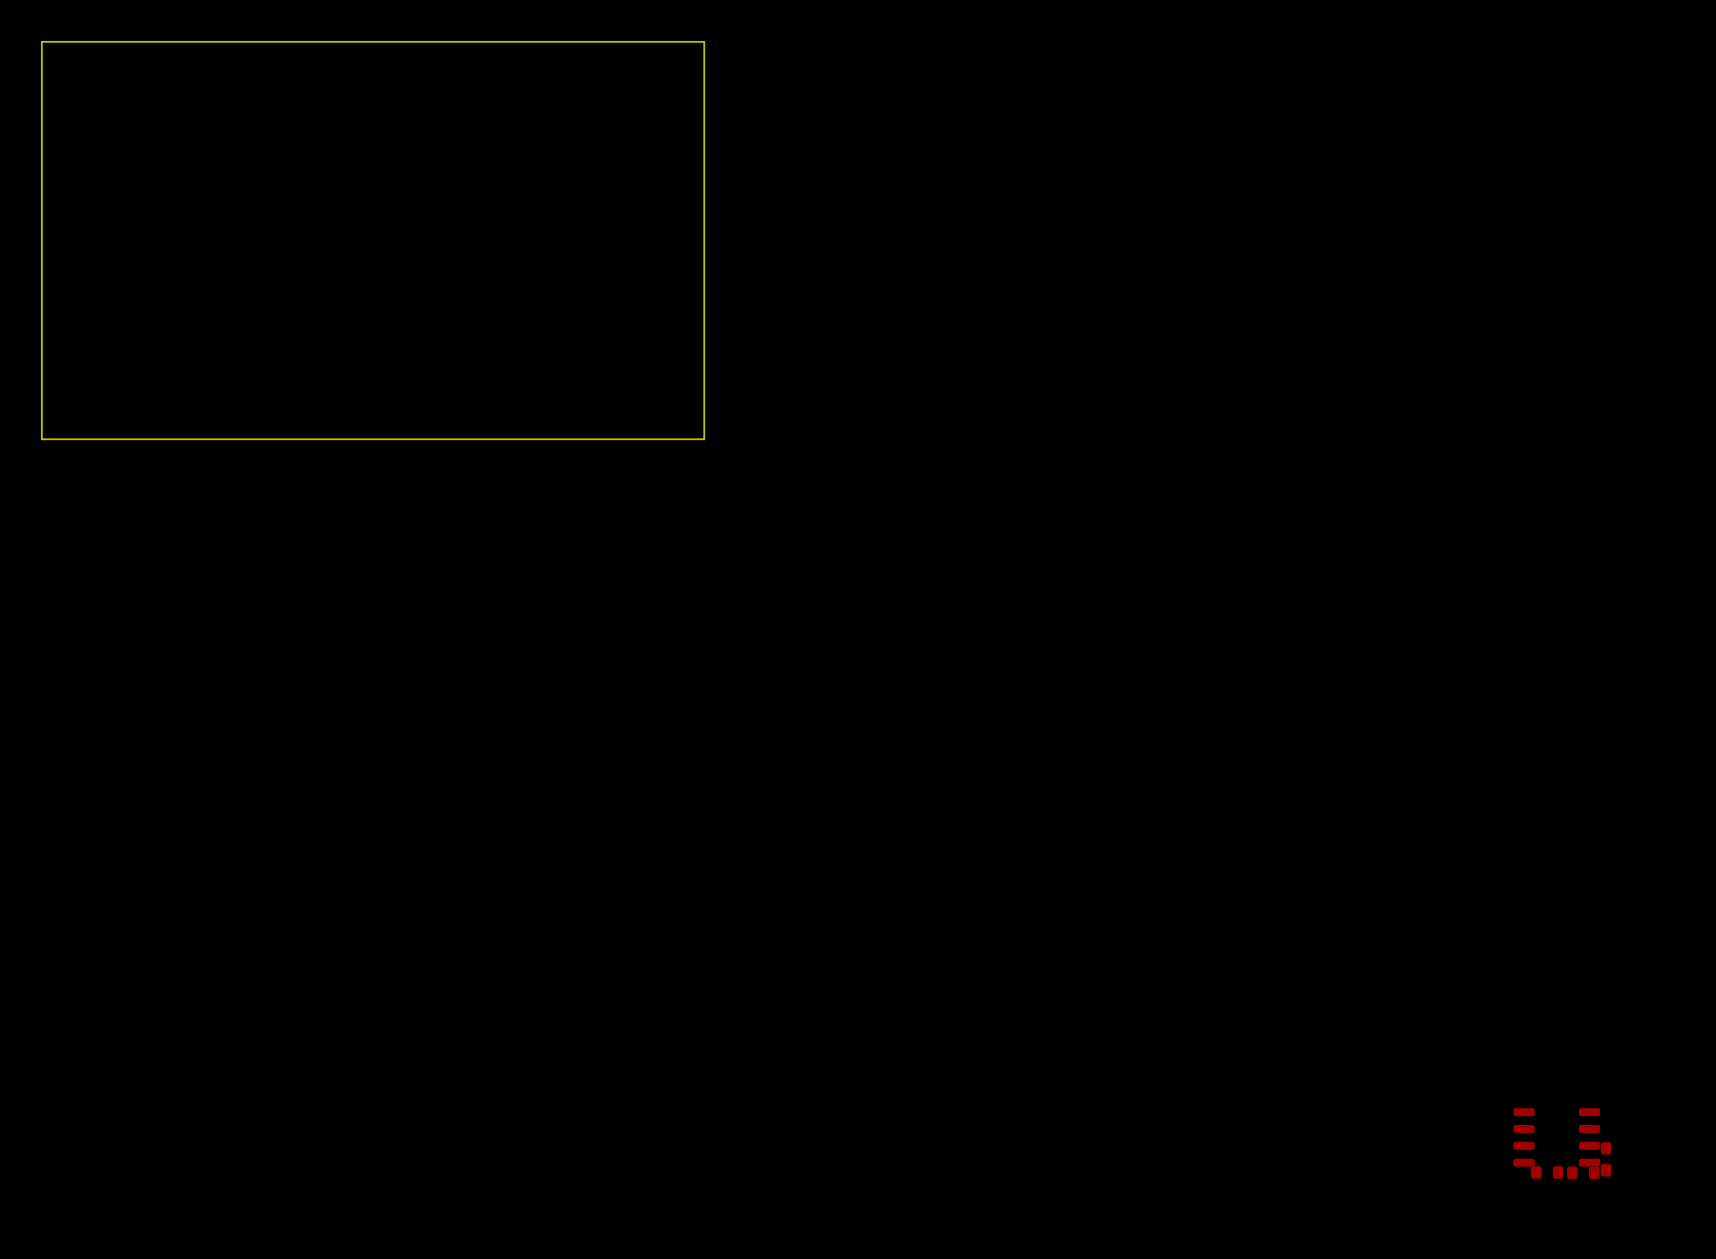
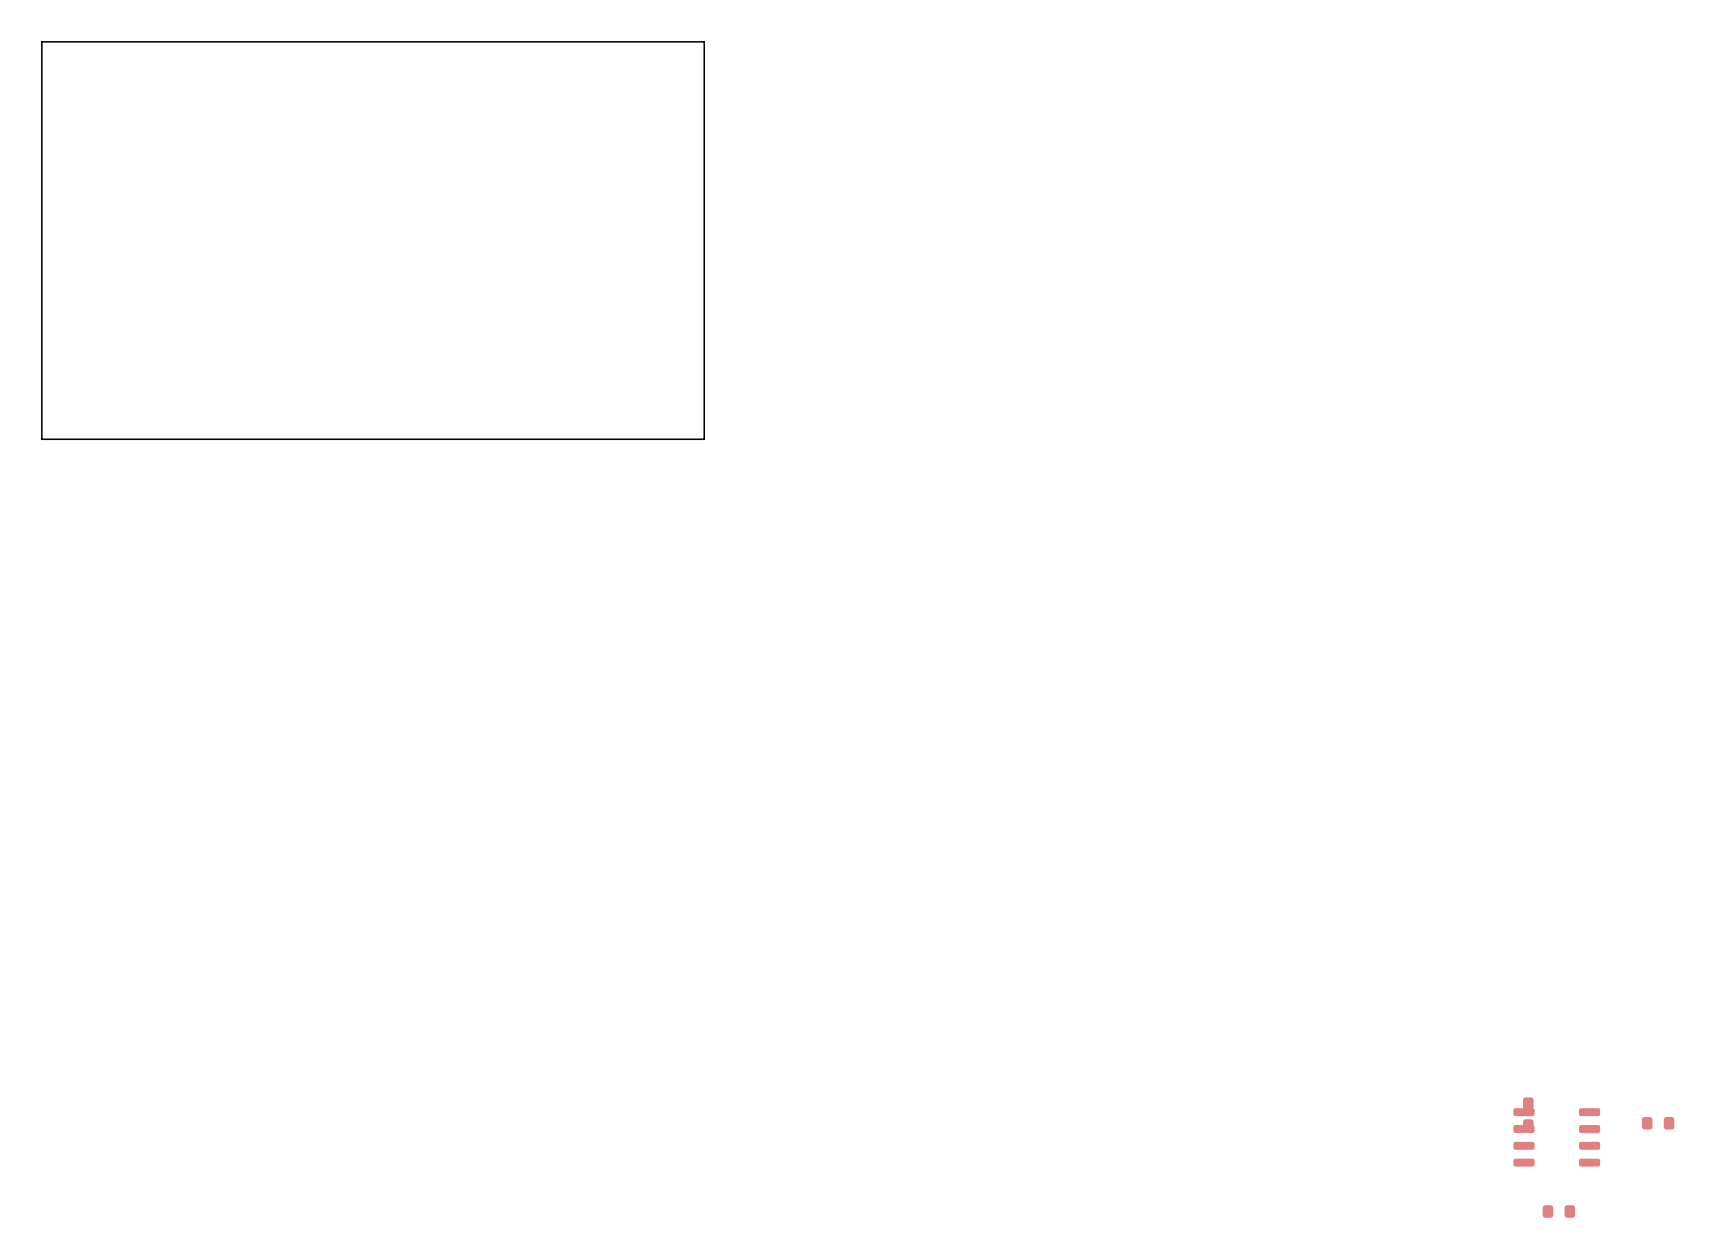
part: none -> (1658, 1123)
part position: (1606, 1159) -> (1528, 1114)
part: (1547, 1172) -> none
part: (1583, 1172) -> none
part: none -> (1558, 1211)

